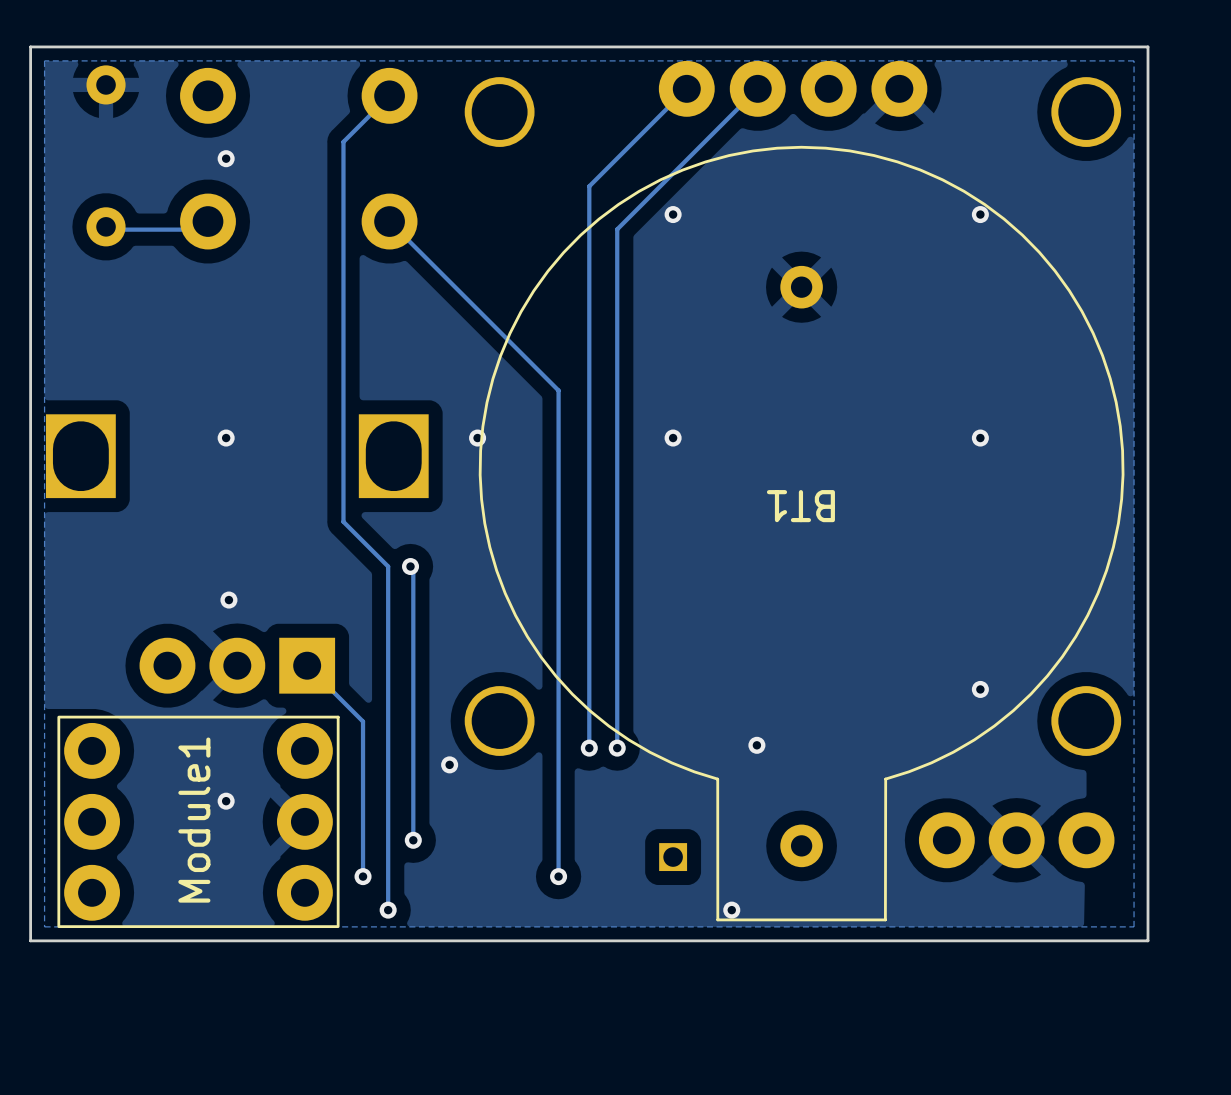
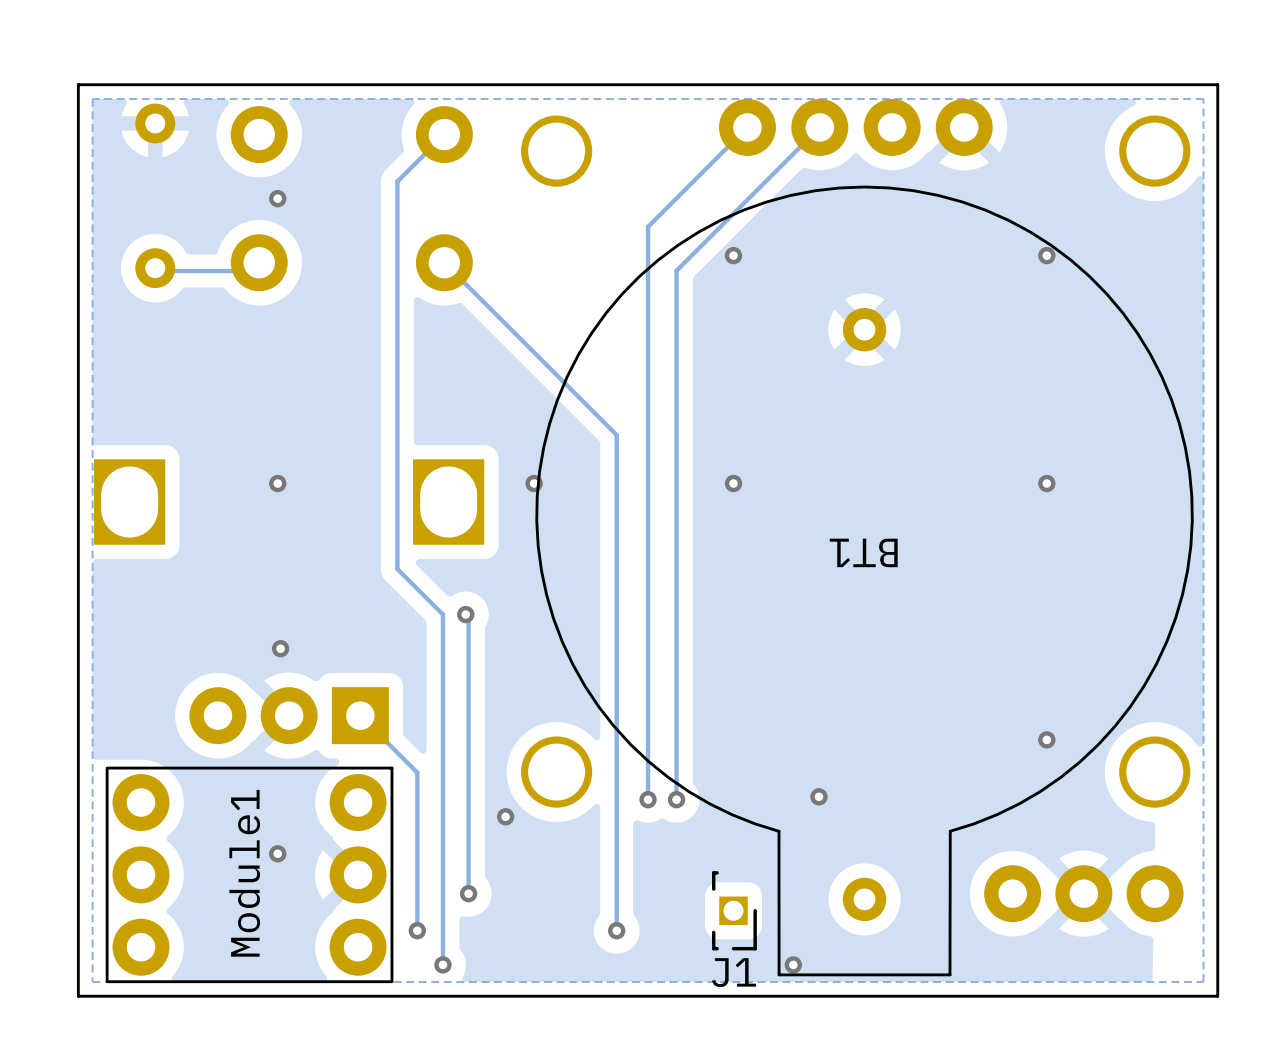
J1 side: top (673, 857) -> bottom (734, 910)

